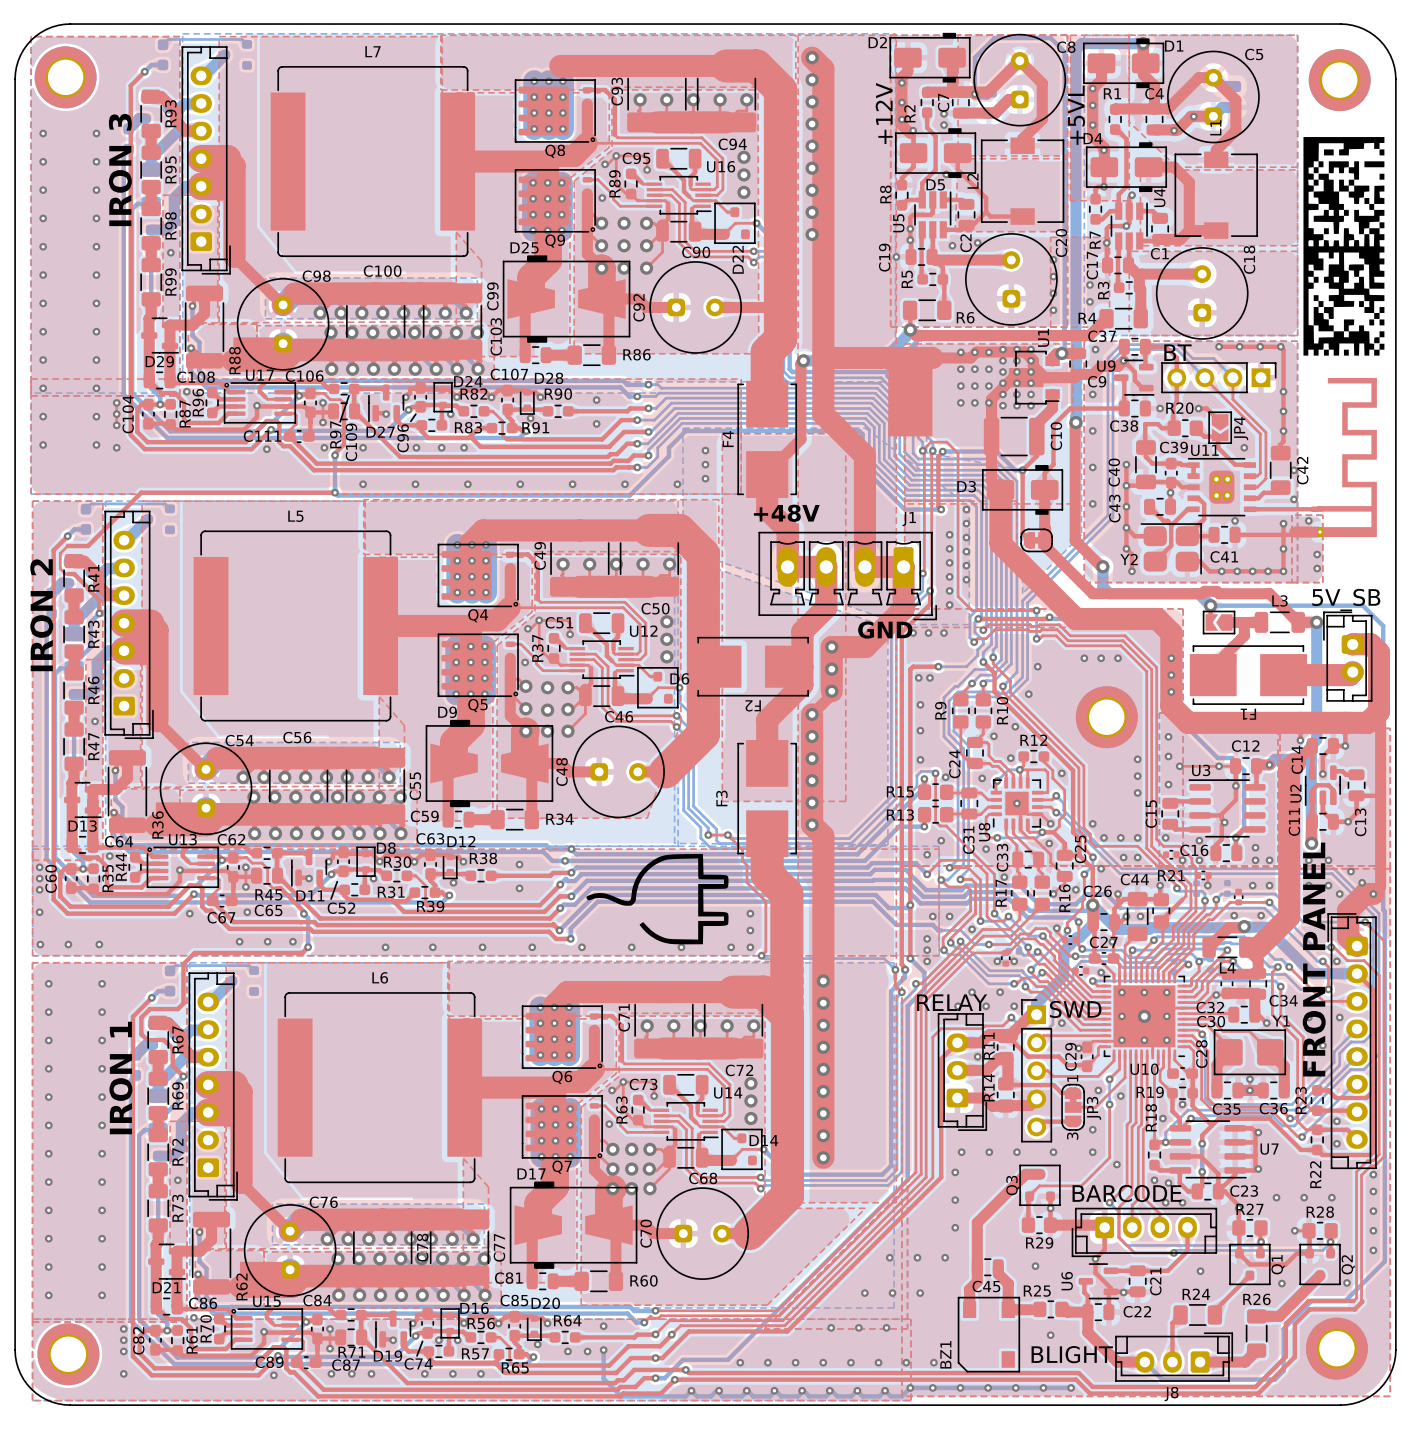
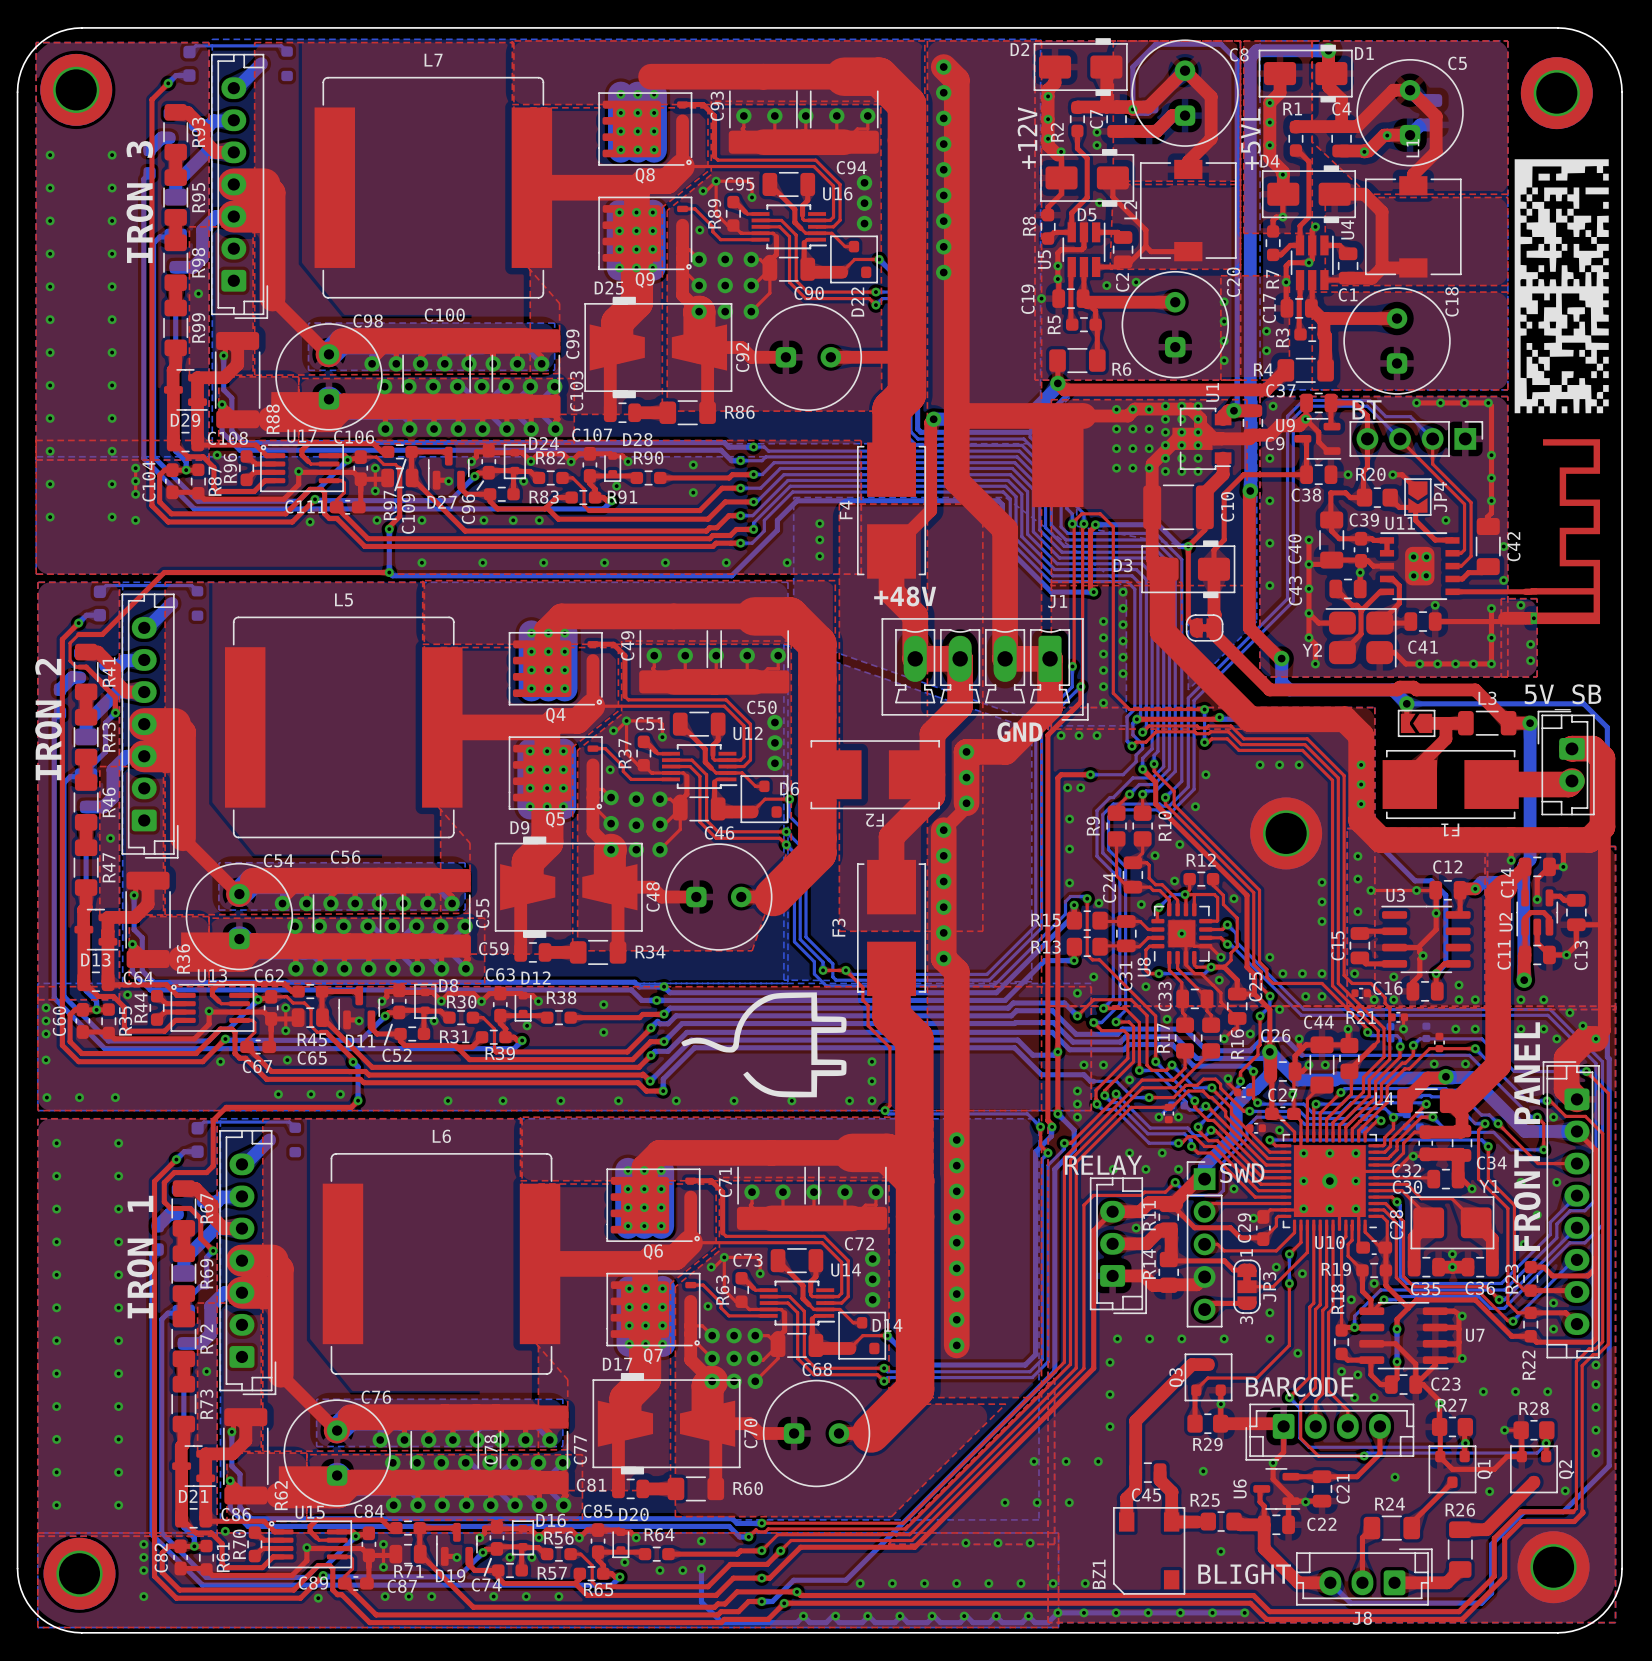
L4 name position: L4 (1227, 967) -> L4 (1384, 1098)

